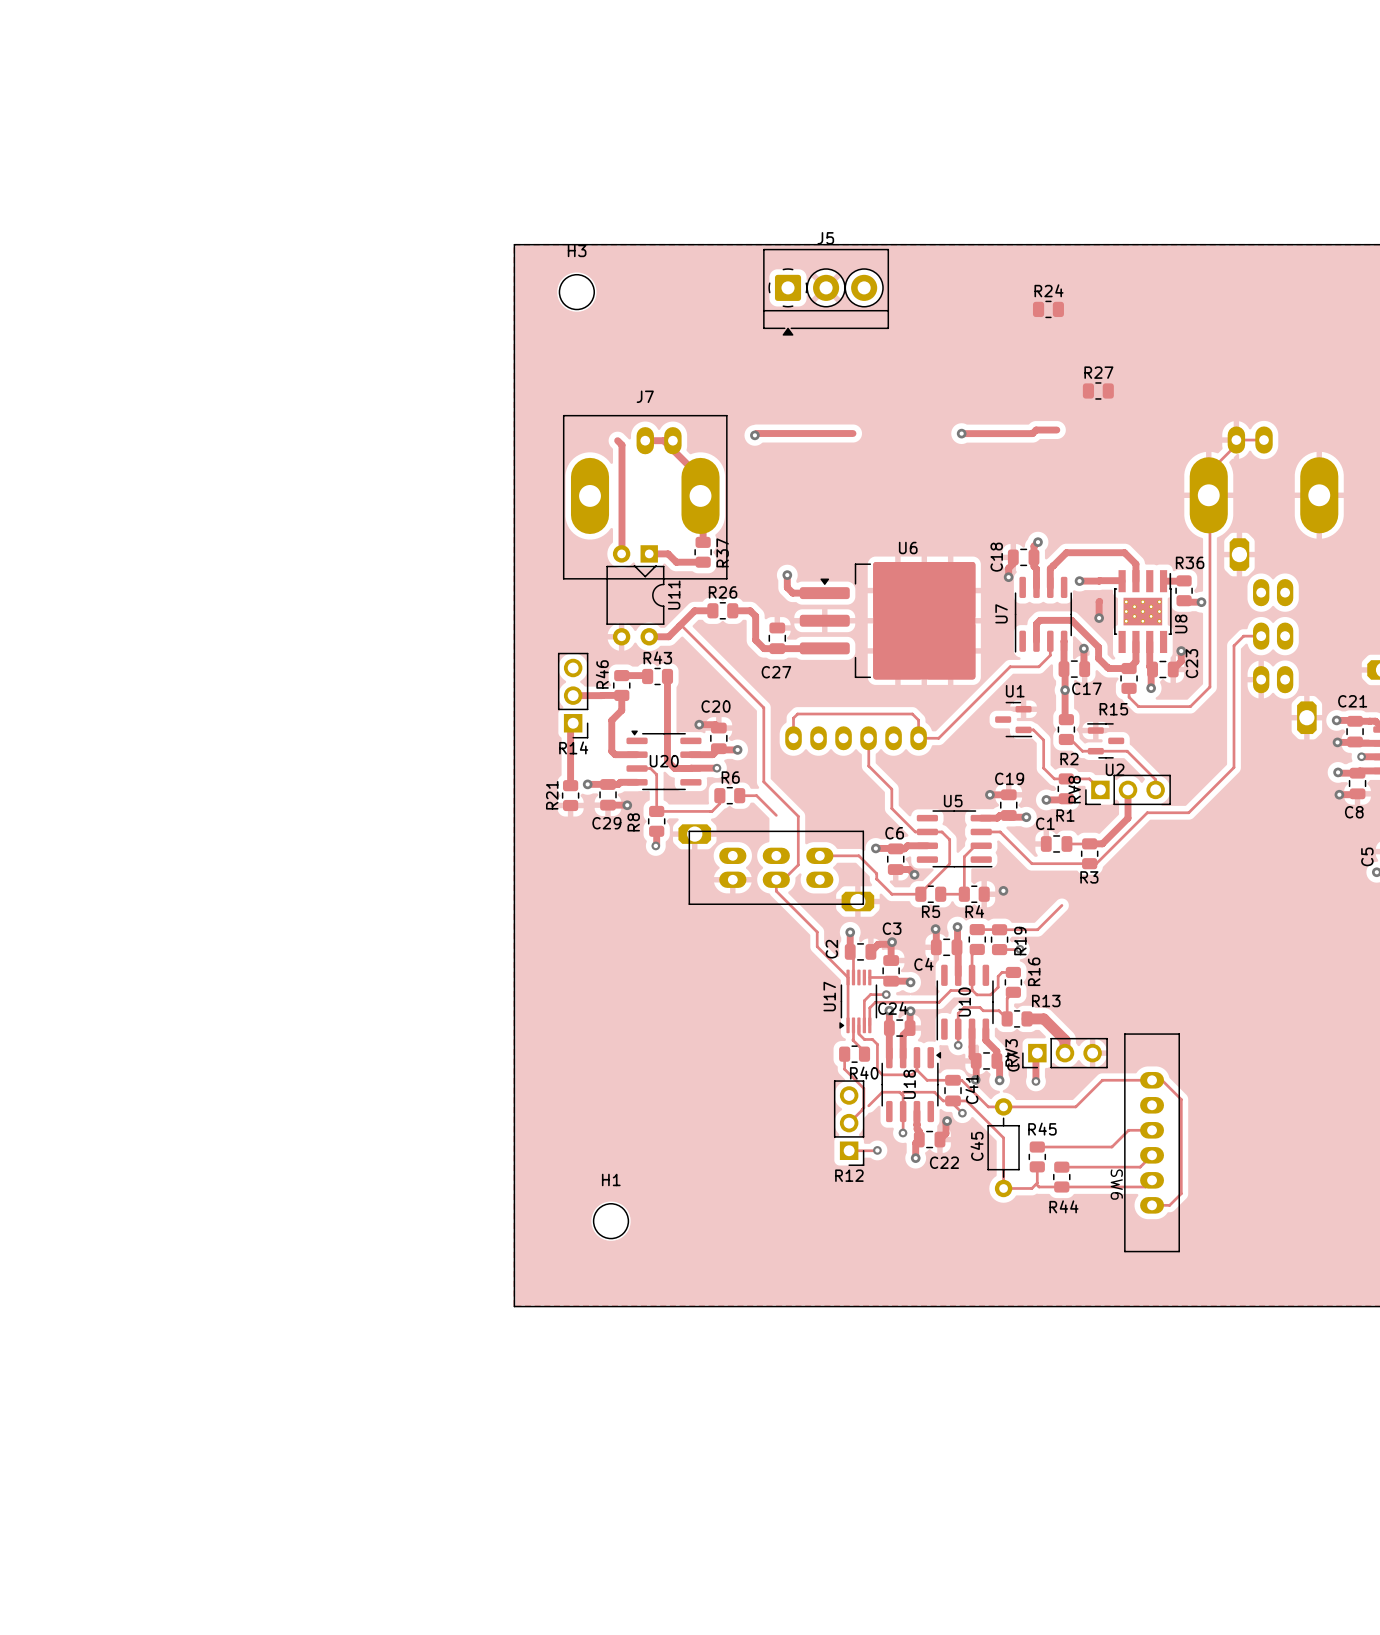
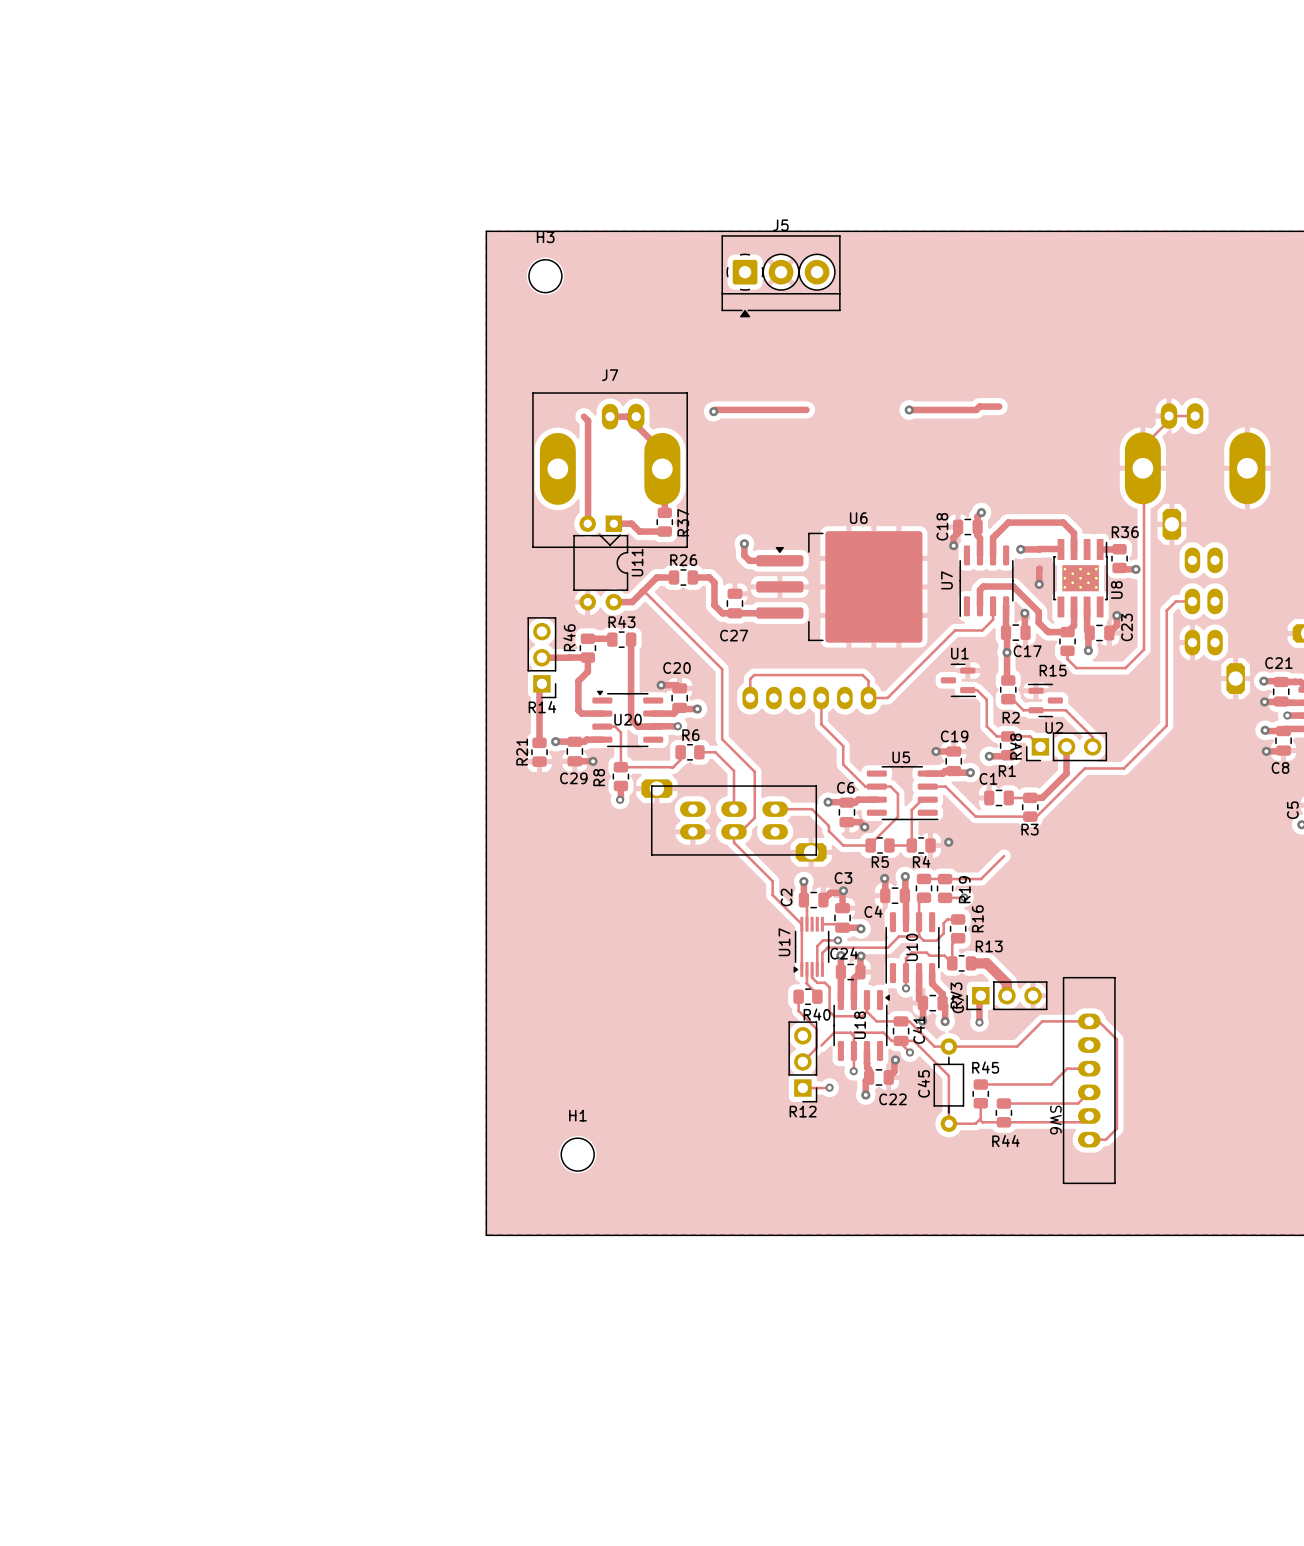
R24: (1048, 309) -> none
R27: (1098, 390) -> none
track: none -> (734, 770) (734, 809)

